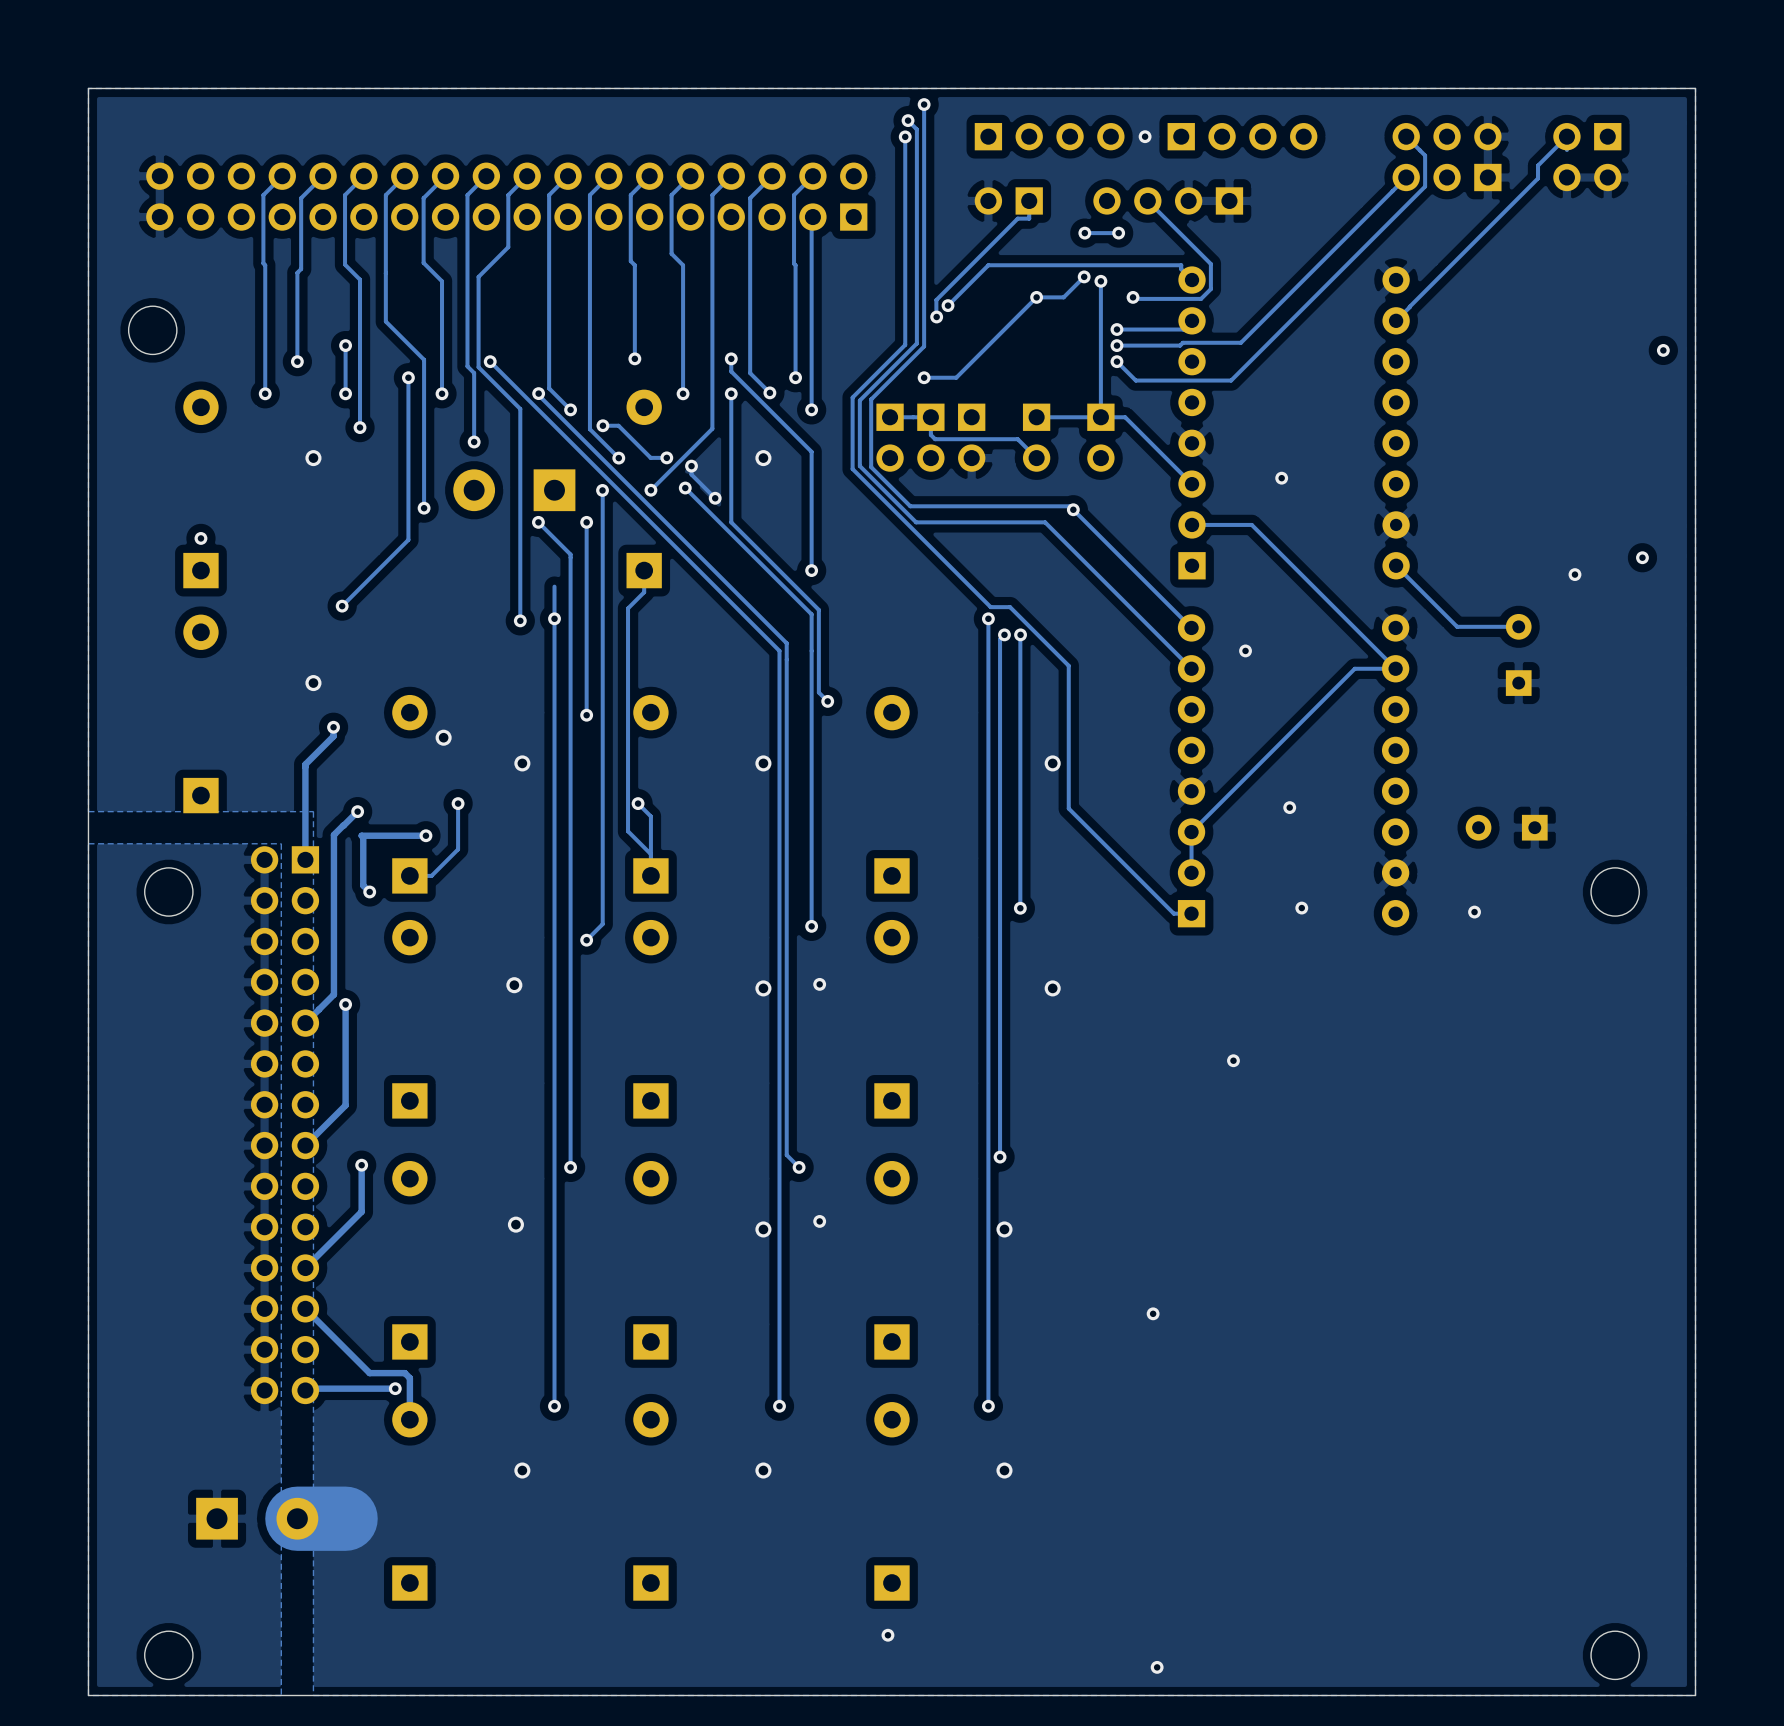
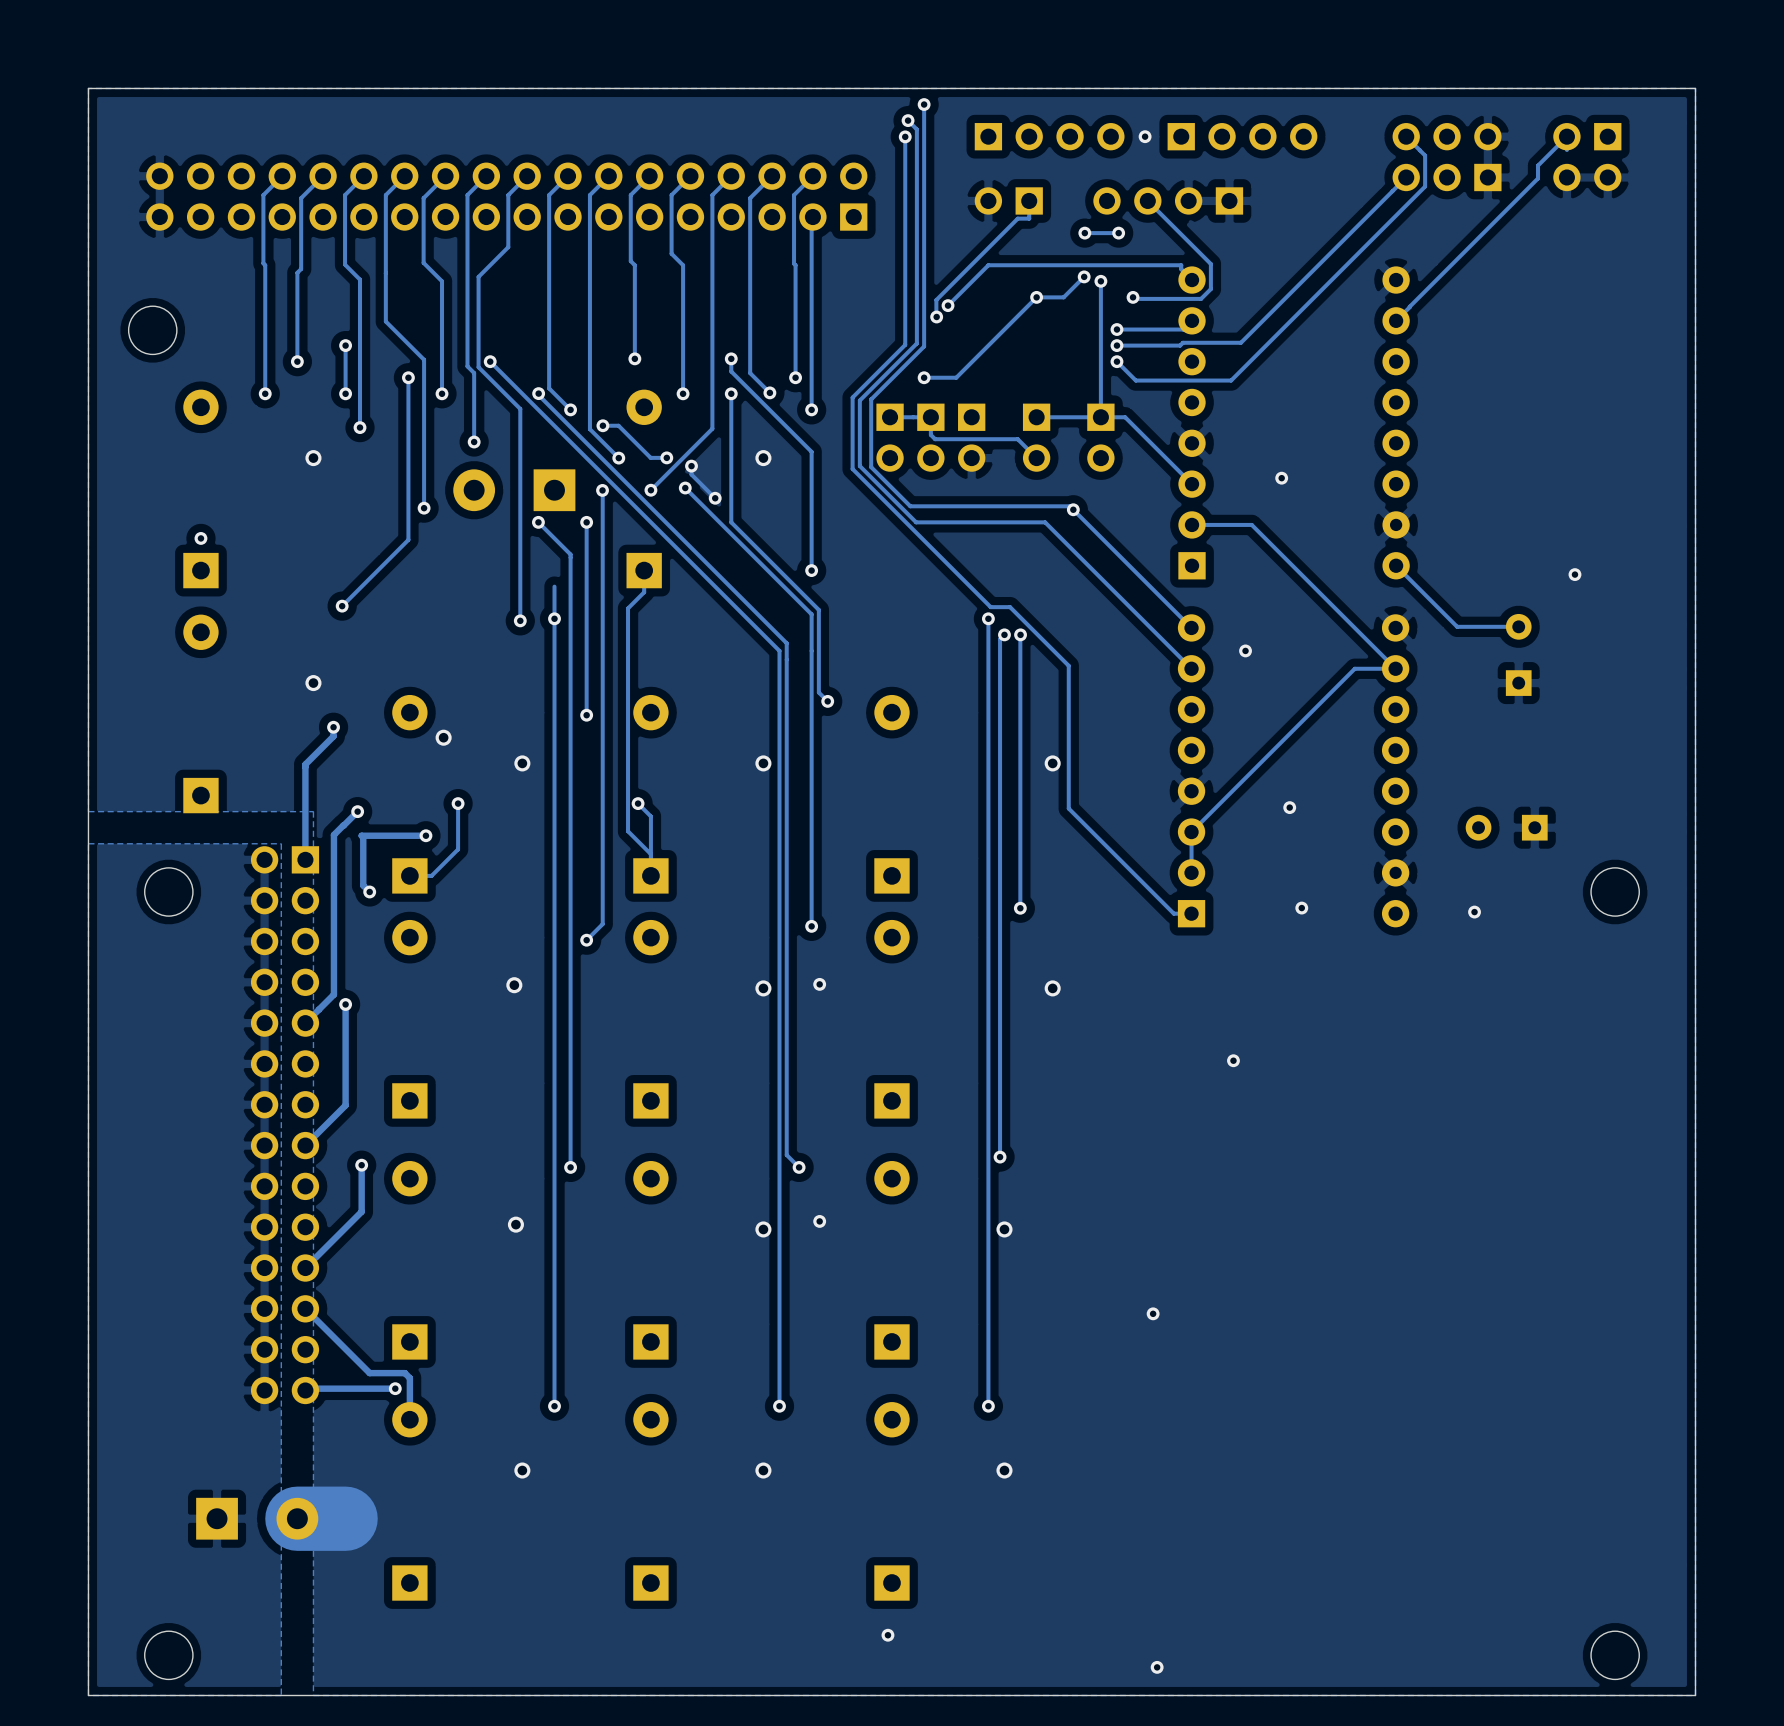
via: (1663, 350) -> none
via: (1642, 557) -> none

